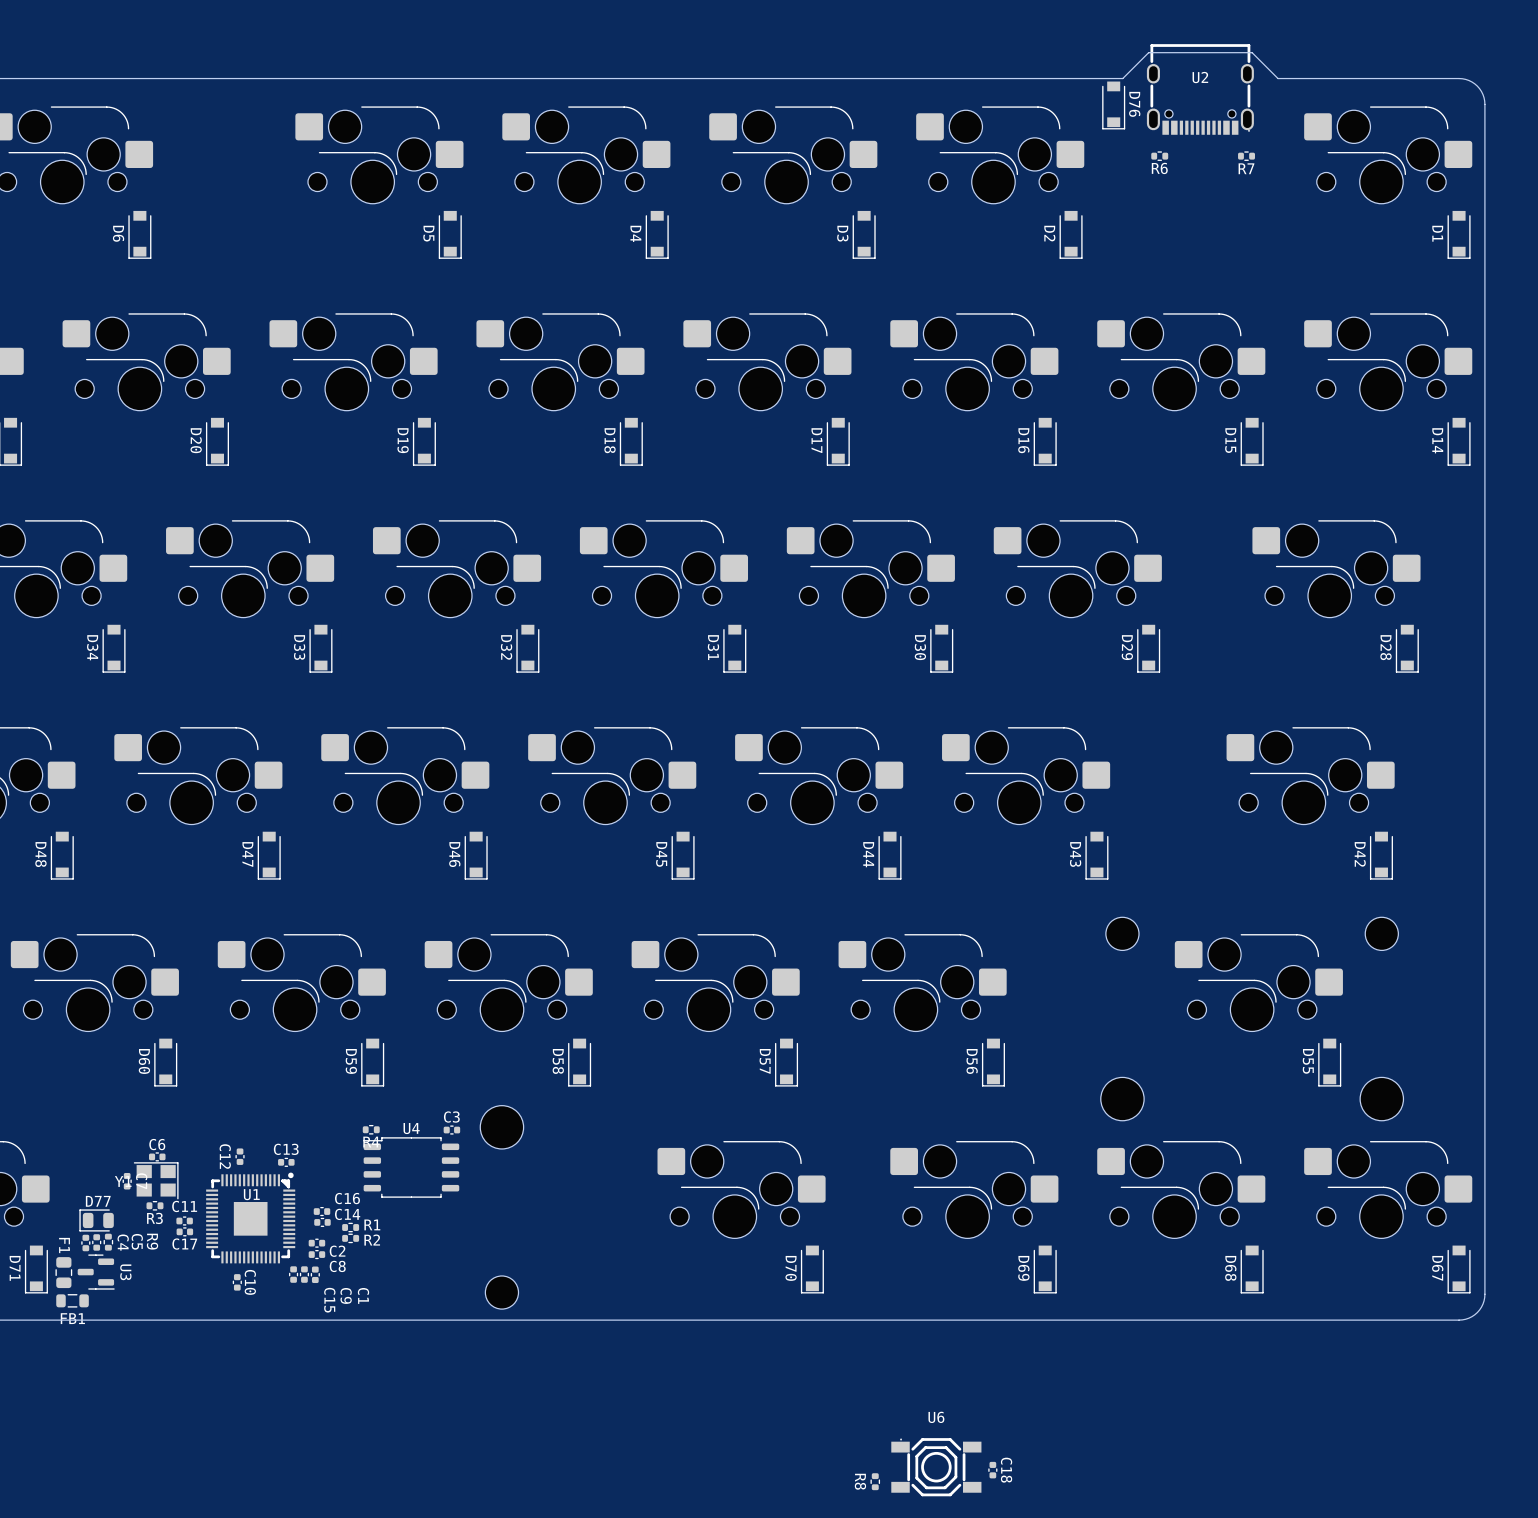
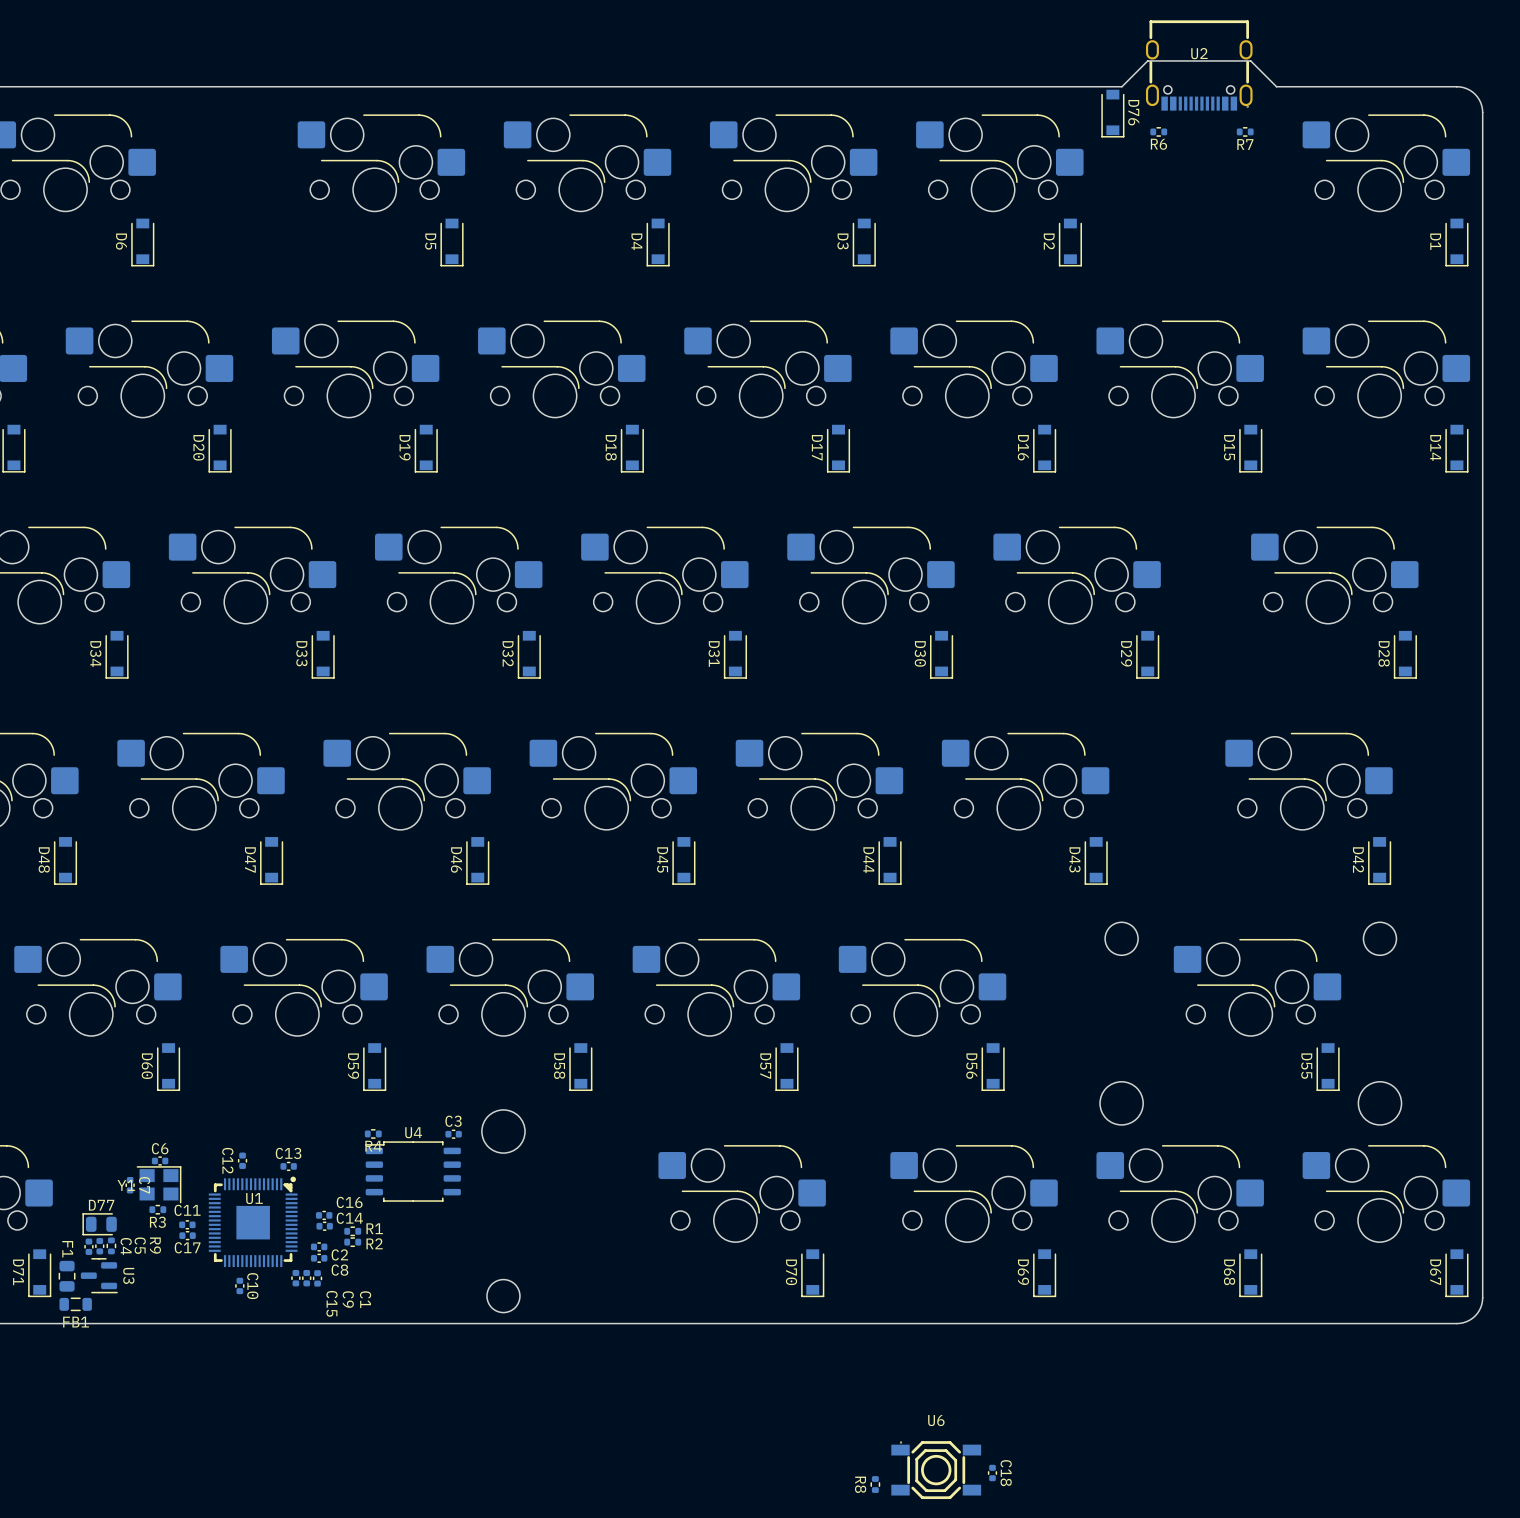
U2 position: (1200, 89) -> (1199, 65)
R6 position: (1159, 156) -> (1158, 131)
R7 position: (1246, 156) -> (1245, 131)

